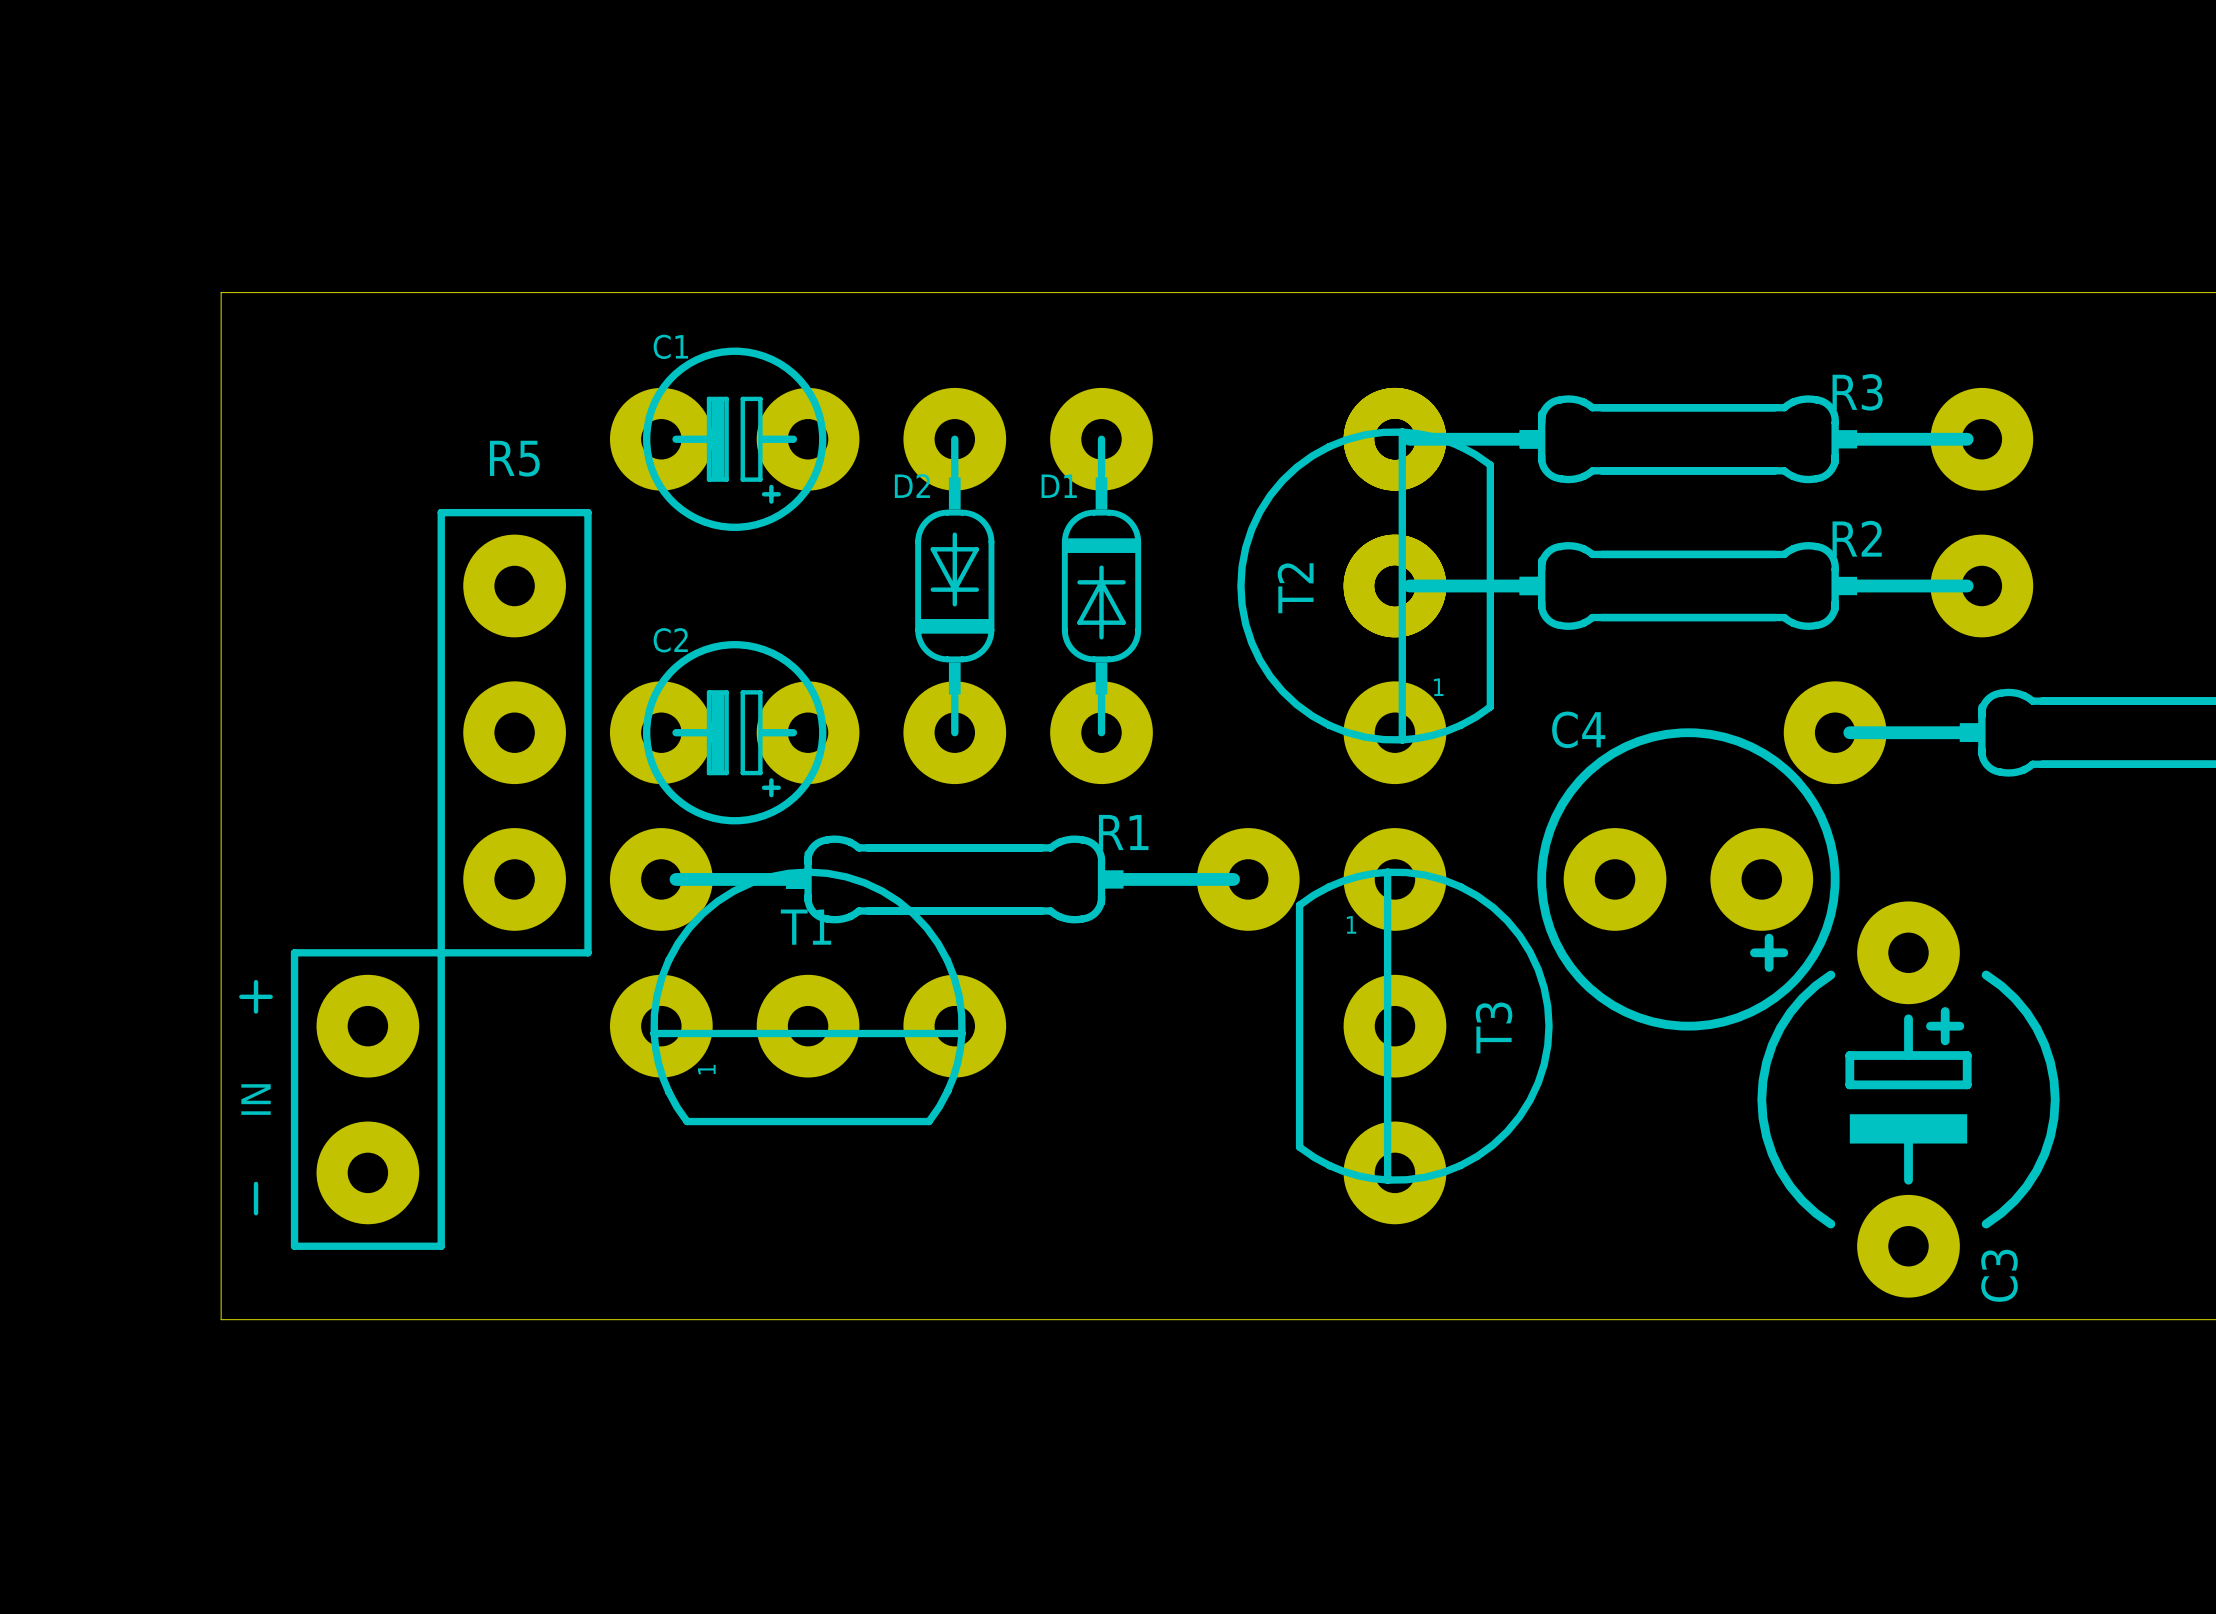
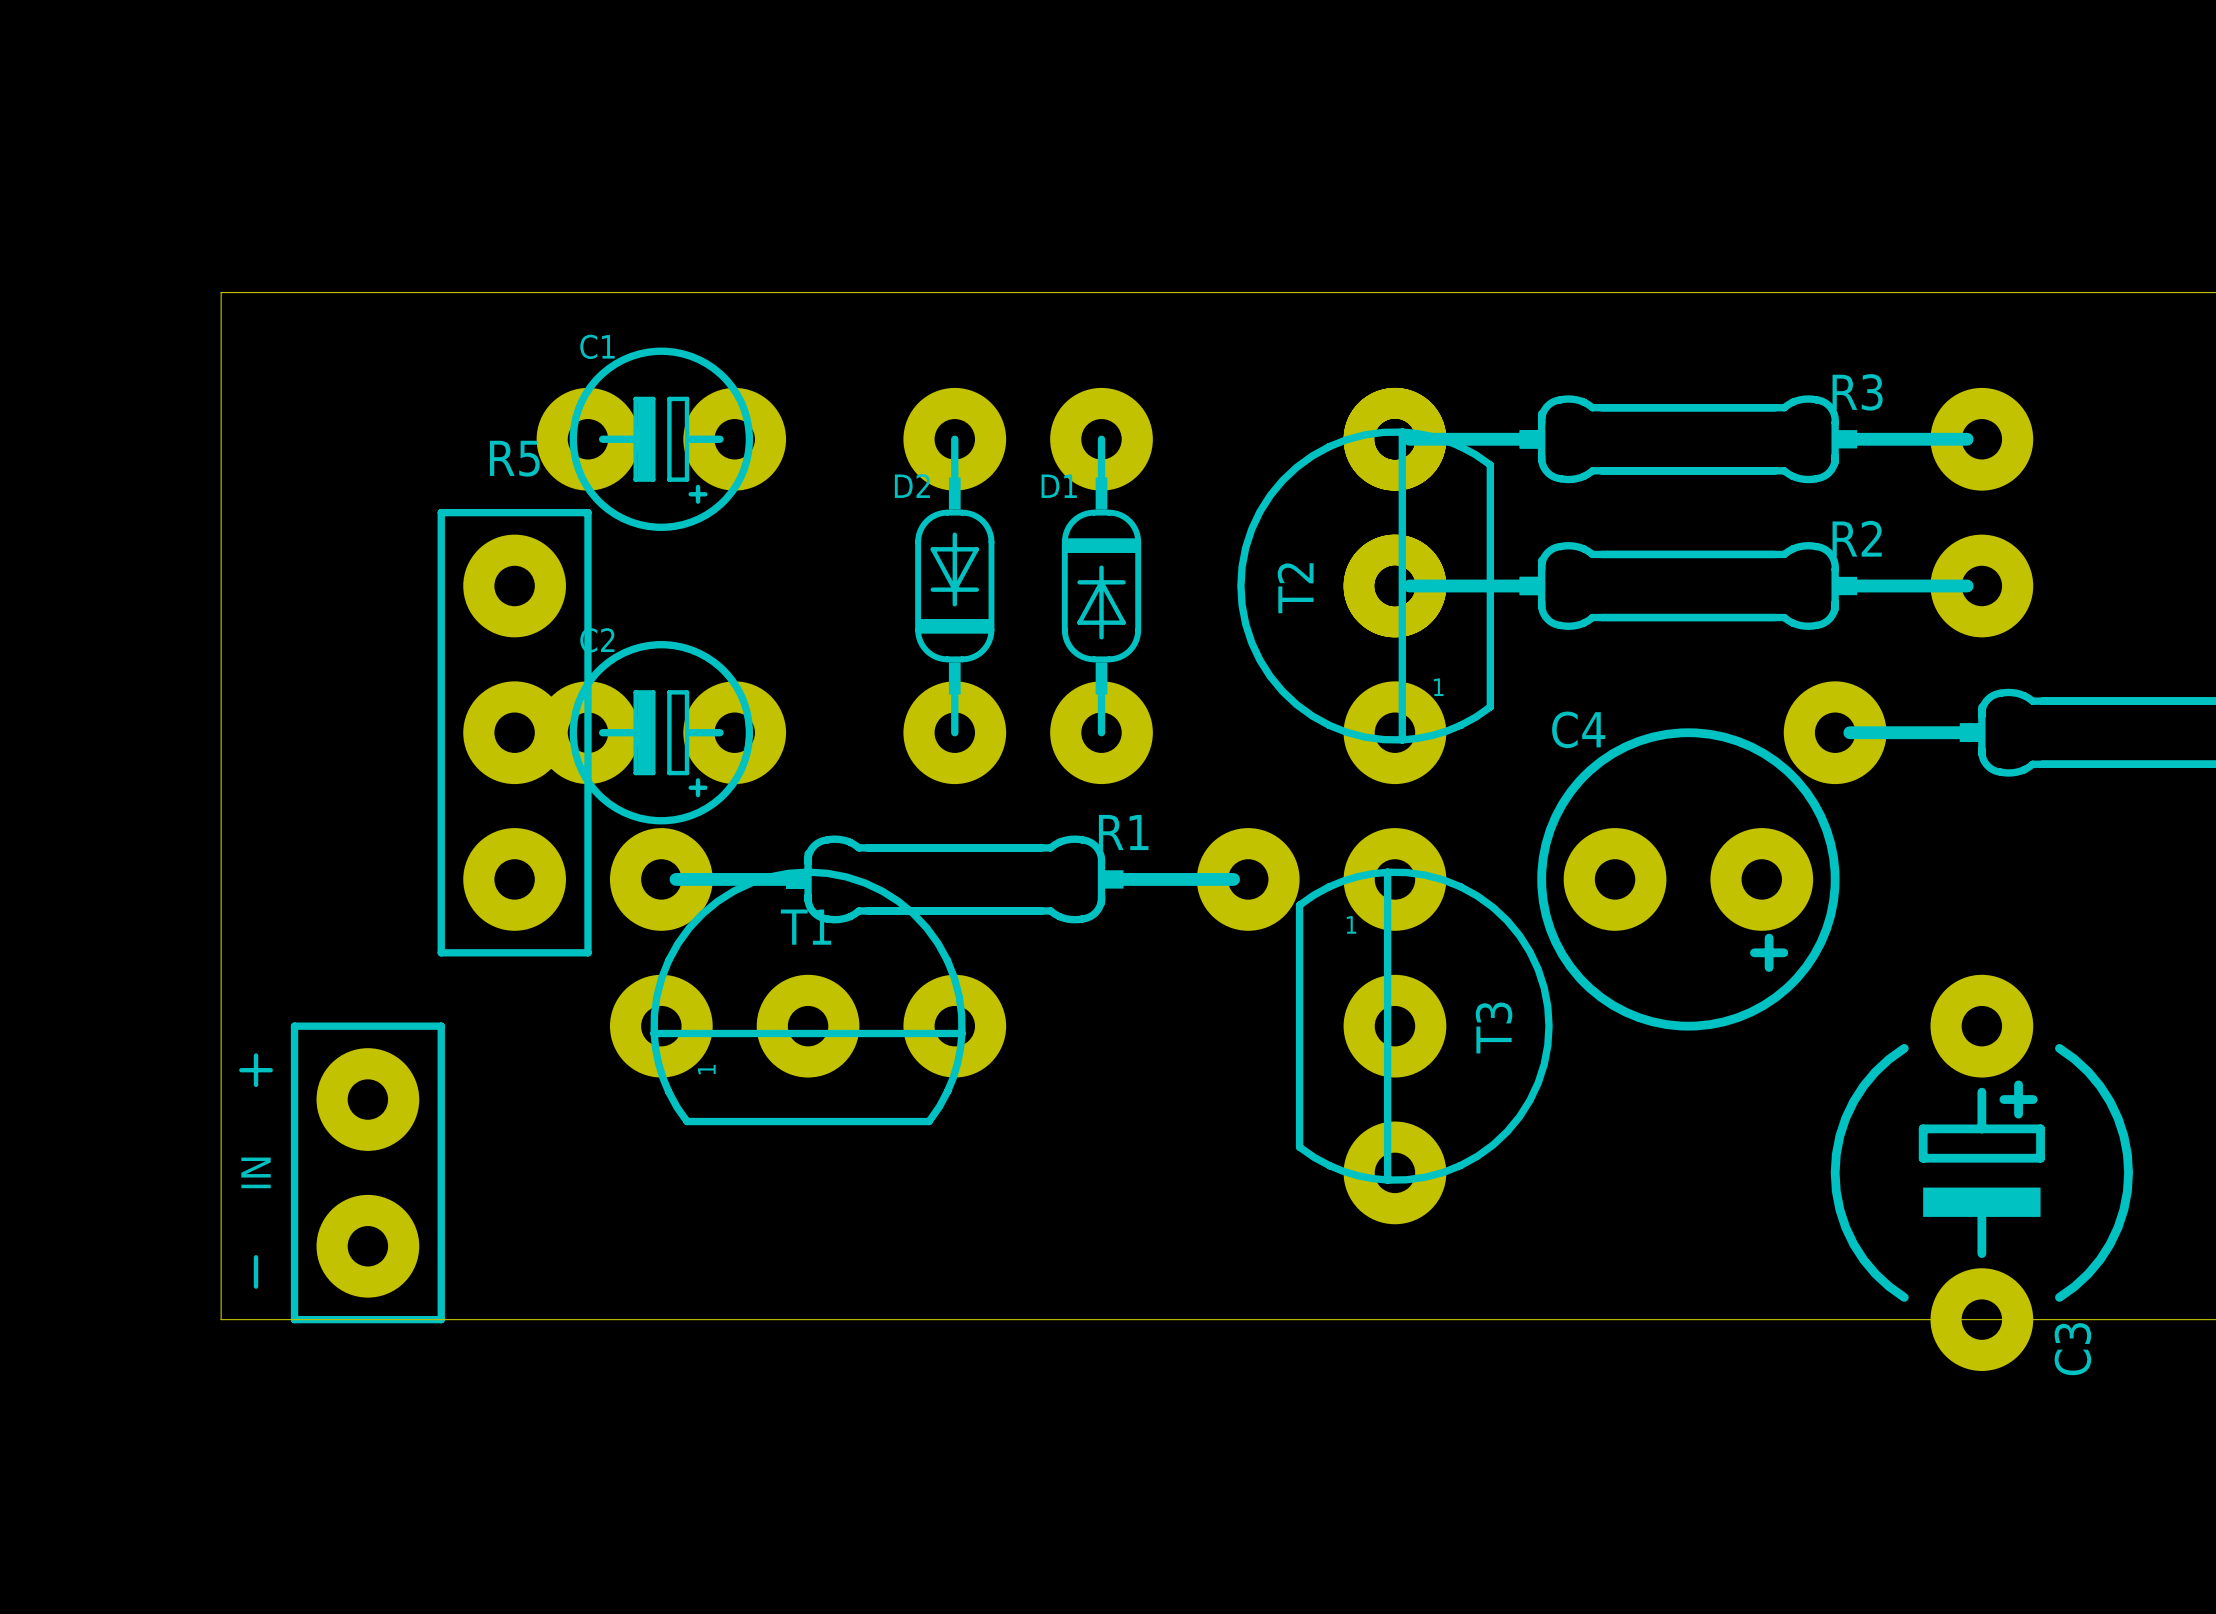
C1 position: (734, 439) -> (661, 439)
C2 position: (734, 732) -> (661, 732)
IN position: (342, 1099) -> (342, 1172)
C3 position: (1908, 1099) -> (1981, 1172)

